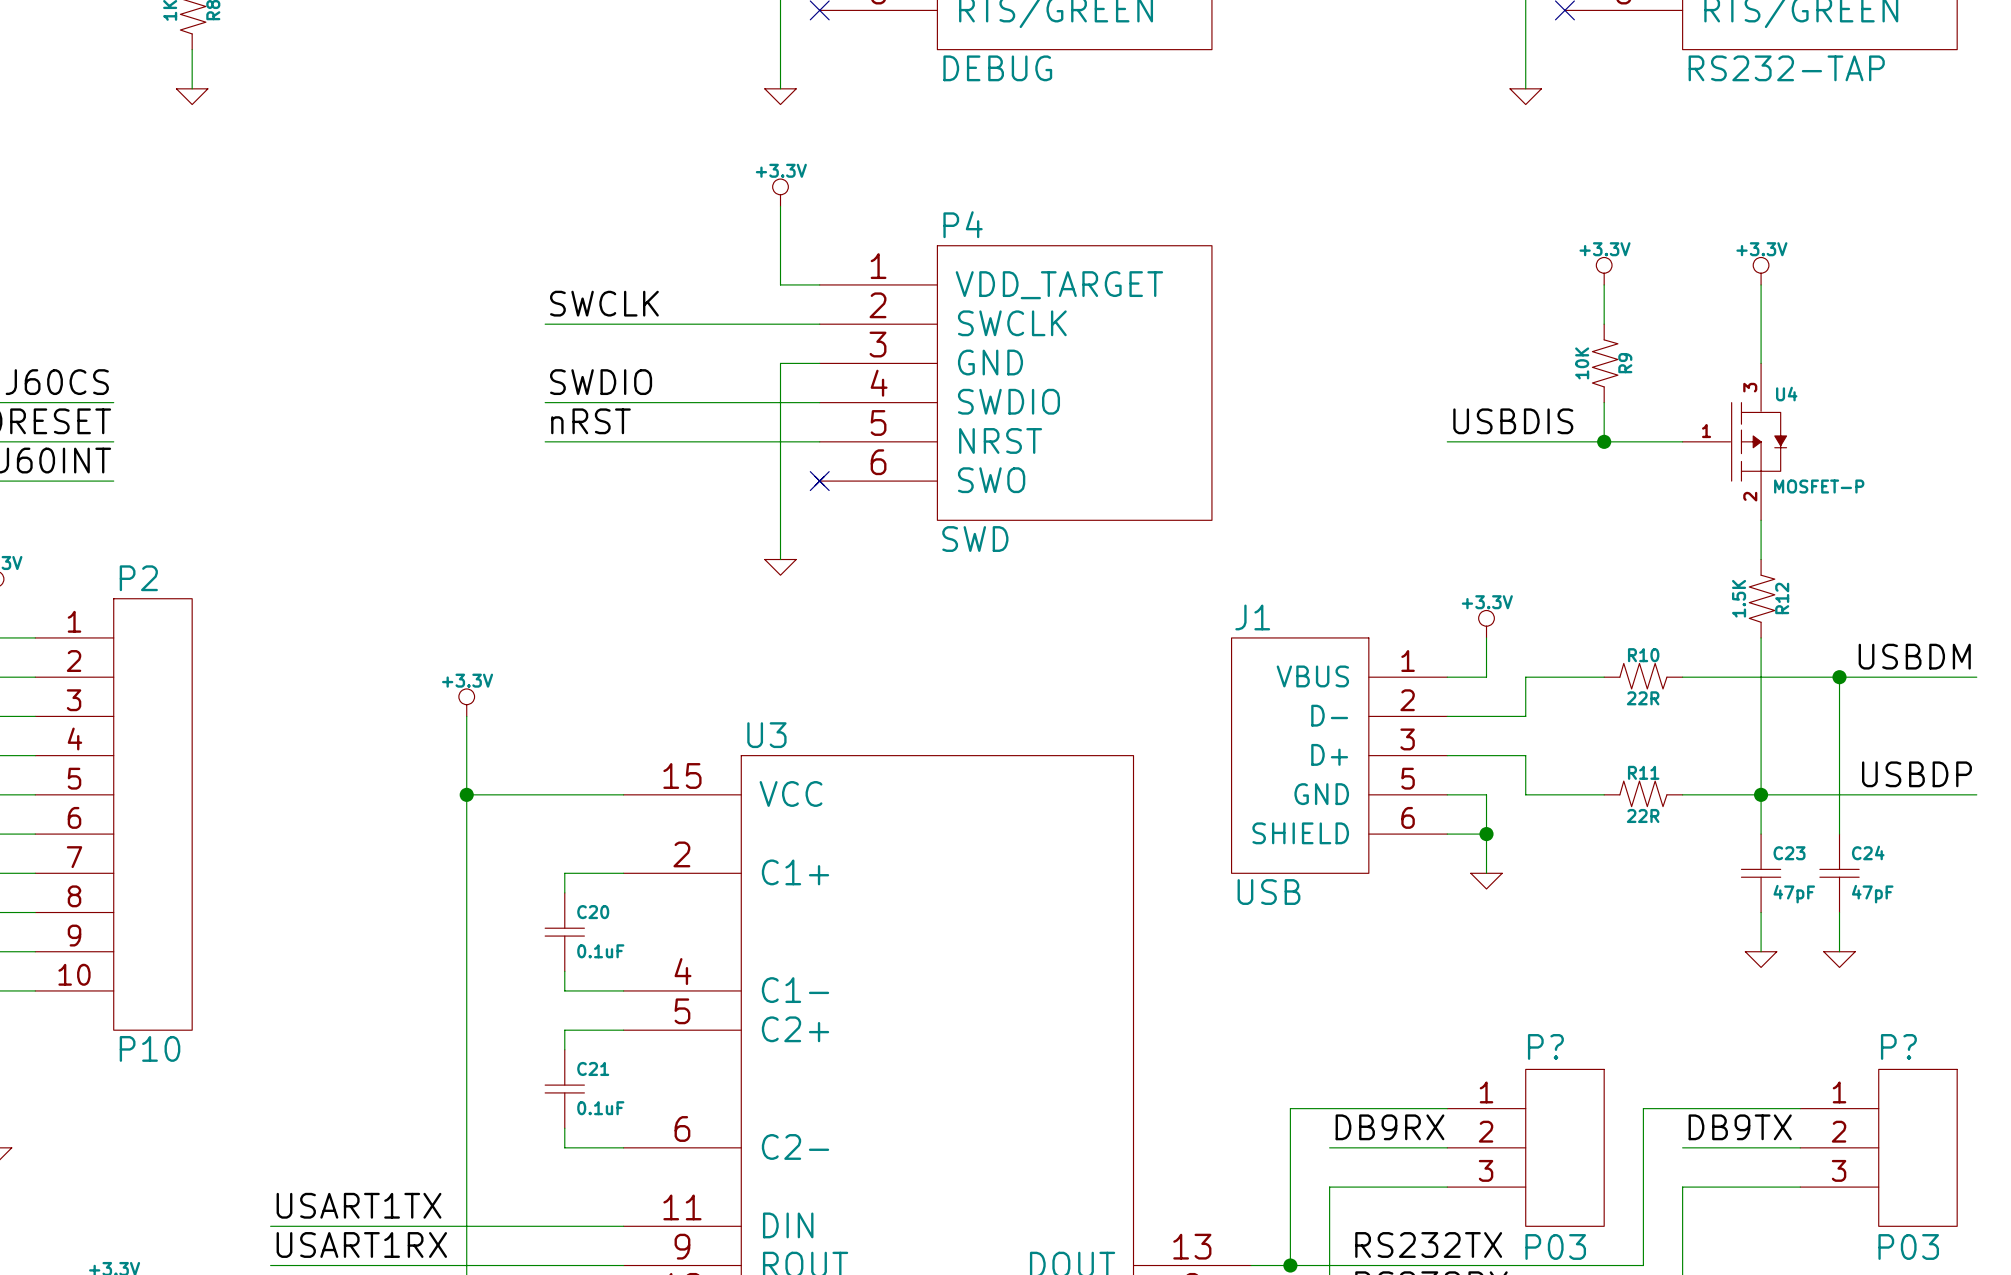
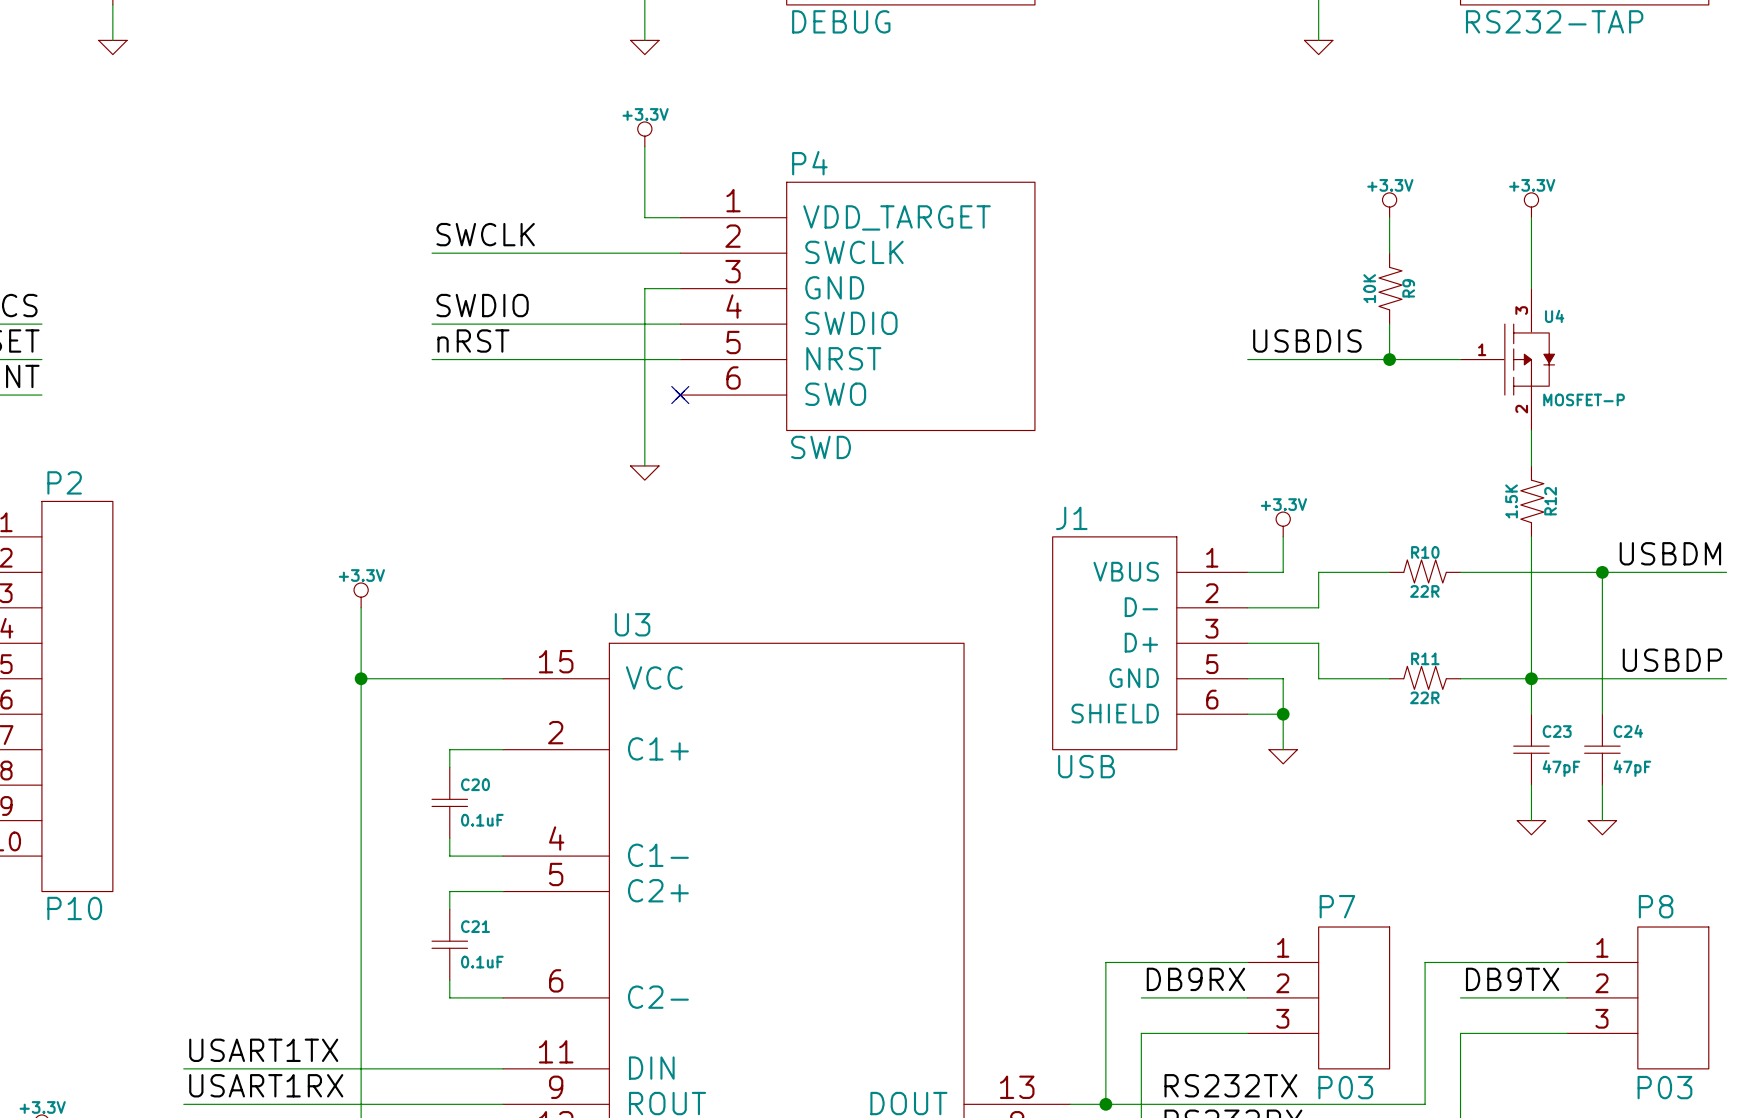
P? name: P? (1545, 1046) -> P7 (1337, 906)
P? name: P? (1898, 1046) -> P8 (1656, 906)

